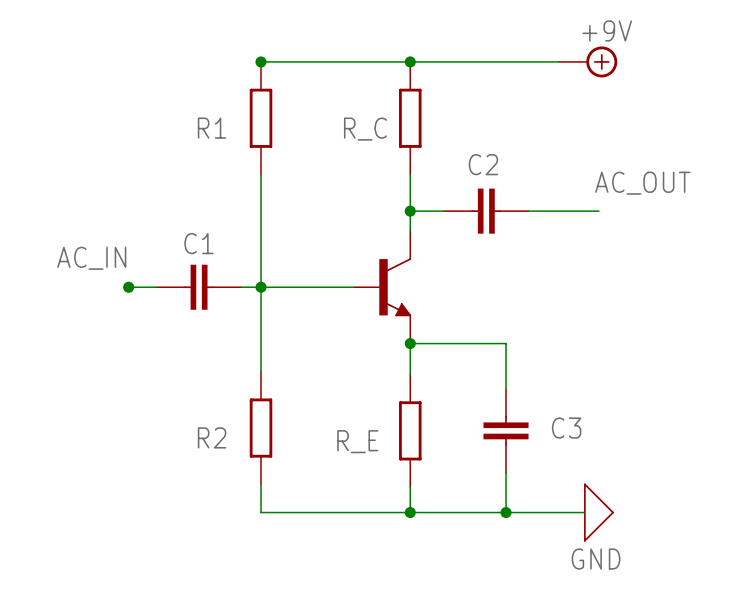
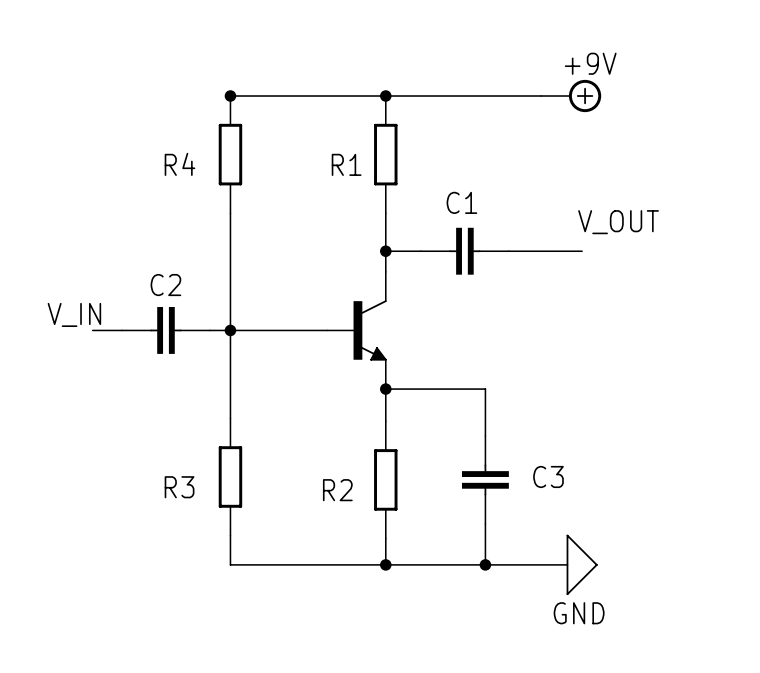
R1 name: R1 (212, 128) -> R4 (179, 164)
R_C name: R_C (365, 129) -> R1 (346, 164)
C2 name: C2 (483, 164) -> C1 (461, 202)
label: AC_OUT (642, 183) -> V_OUT (618, 222)
C1 name: C1 (199, 243) -> C2 (165, 285)
label: AC_IN (91, 258) -> V_IN (74, 314)
junction: (128, 287) -> none
R2 name: R2 (212, 437) -> R3 (179, 487)
R_E name: R_E (357, 441) -> R2 (337, 490)

